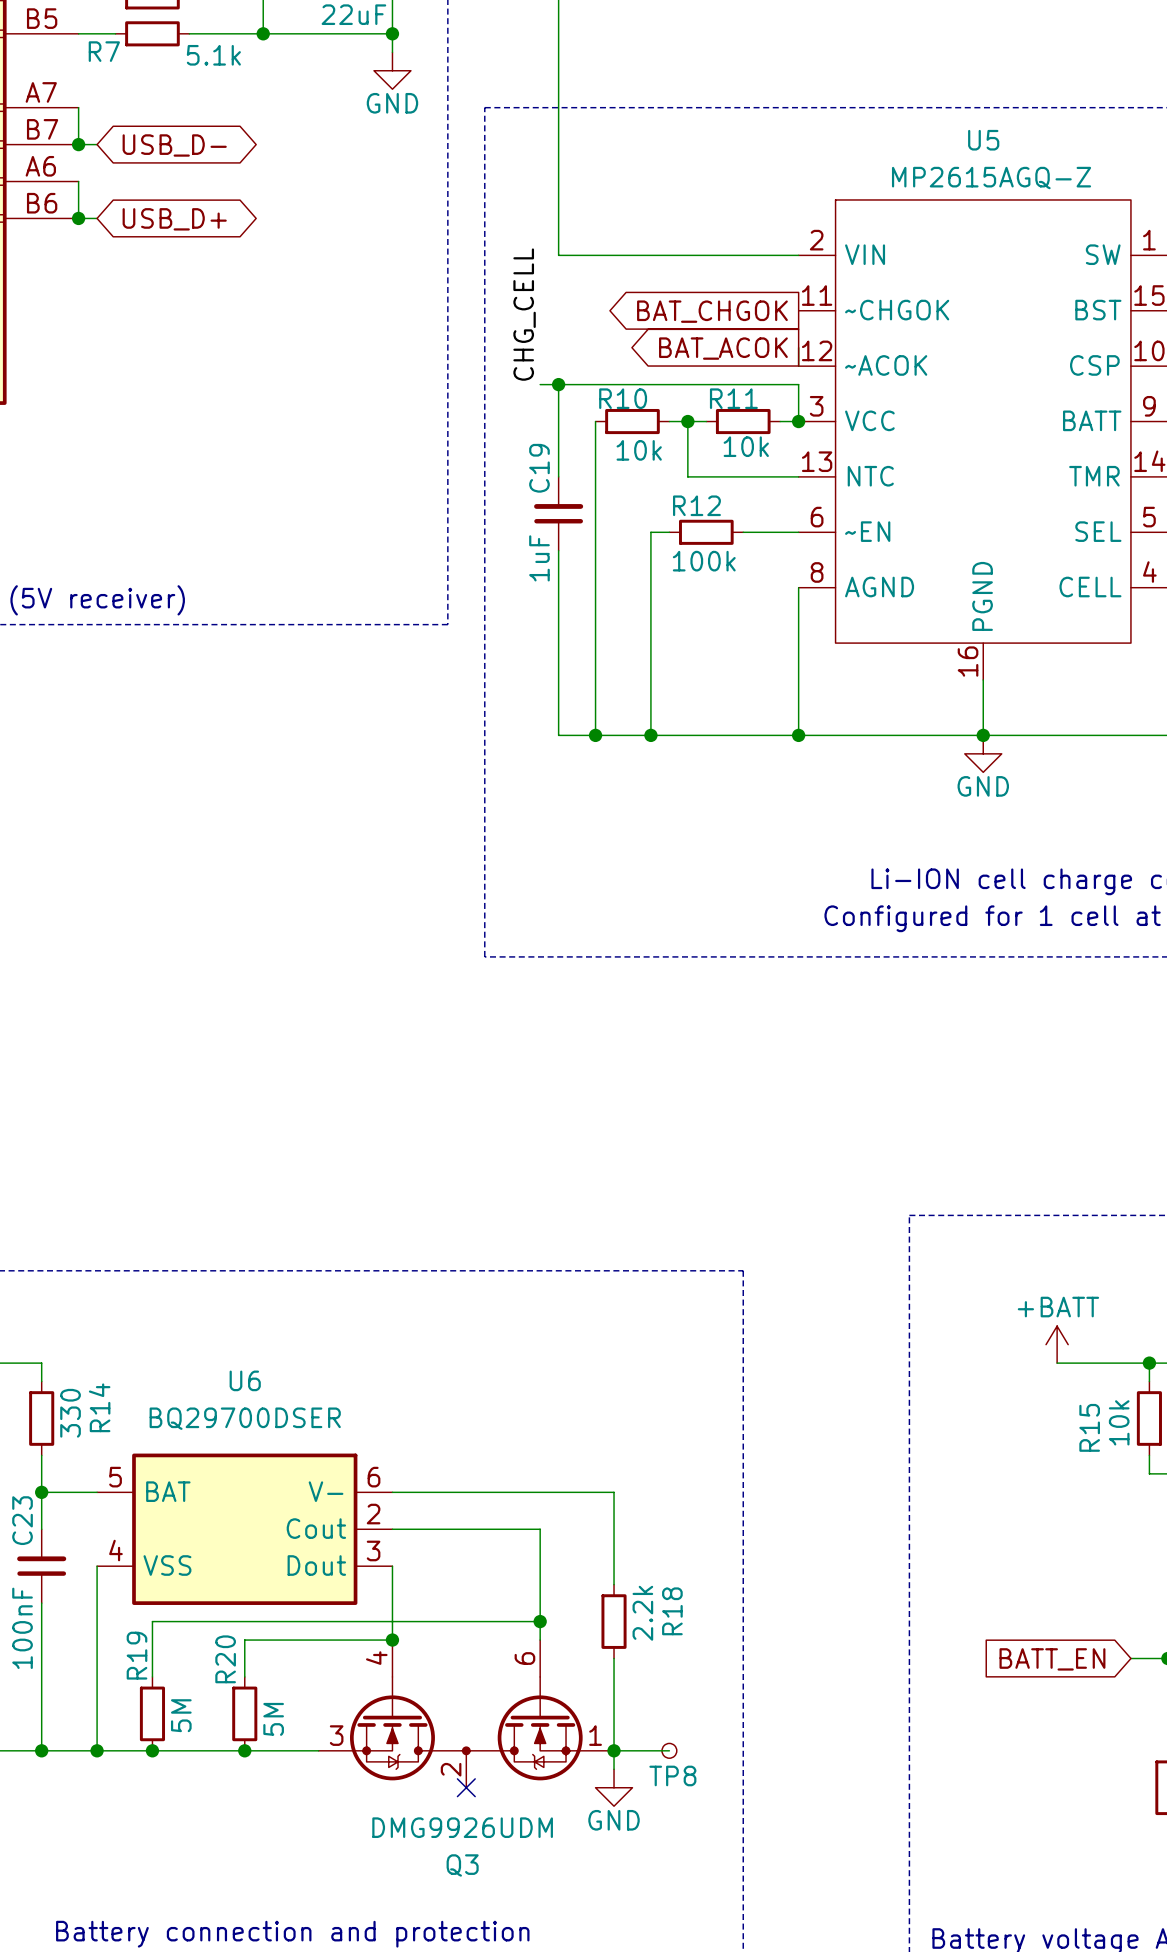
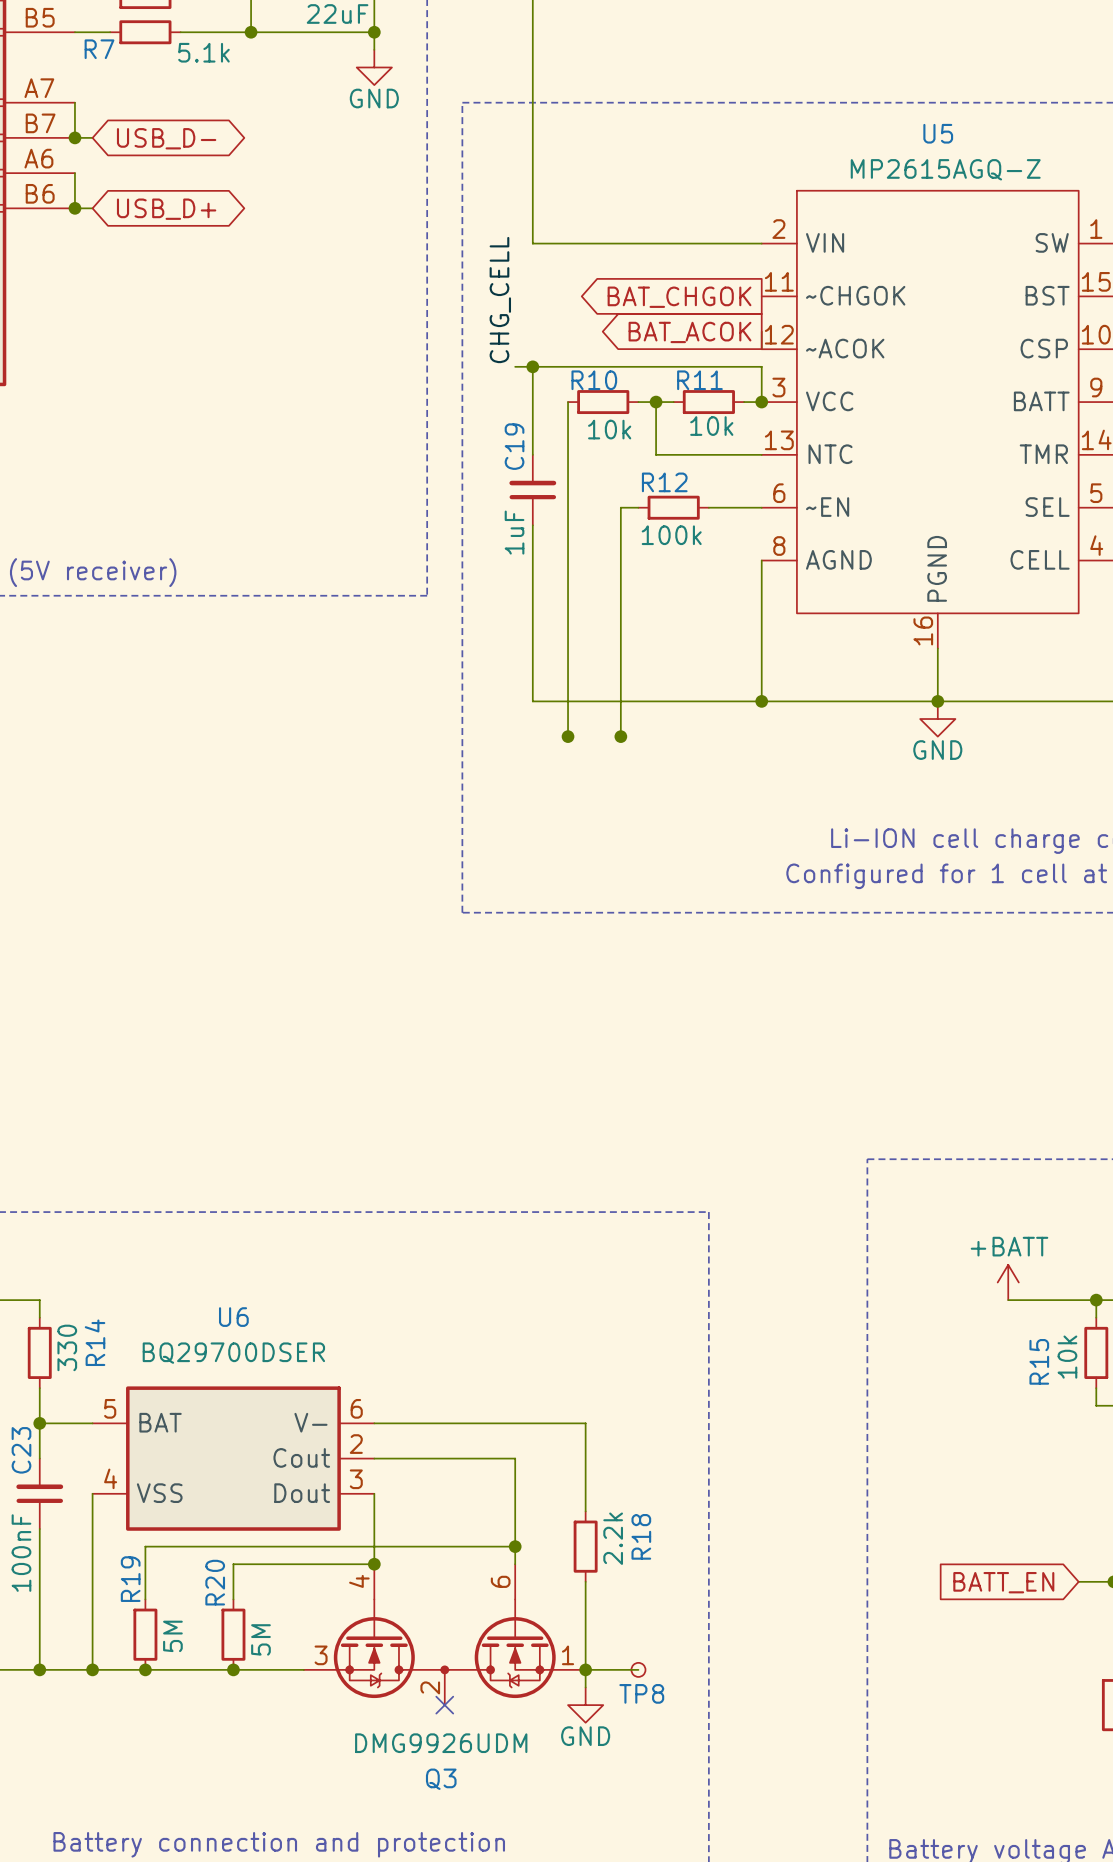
wire: none -> (568, 701) (568, 736)
junction: (595, 735) -> none
wire: none -> (620, 701) (620, 736)
junction: (650, 735) -> none
junction: none -> (568, 736)
junction: none -> (620, 736)

